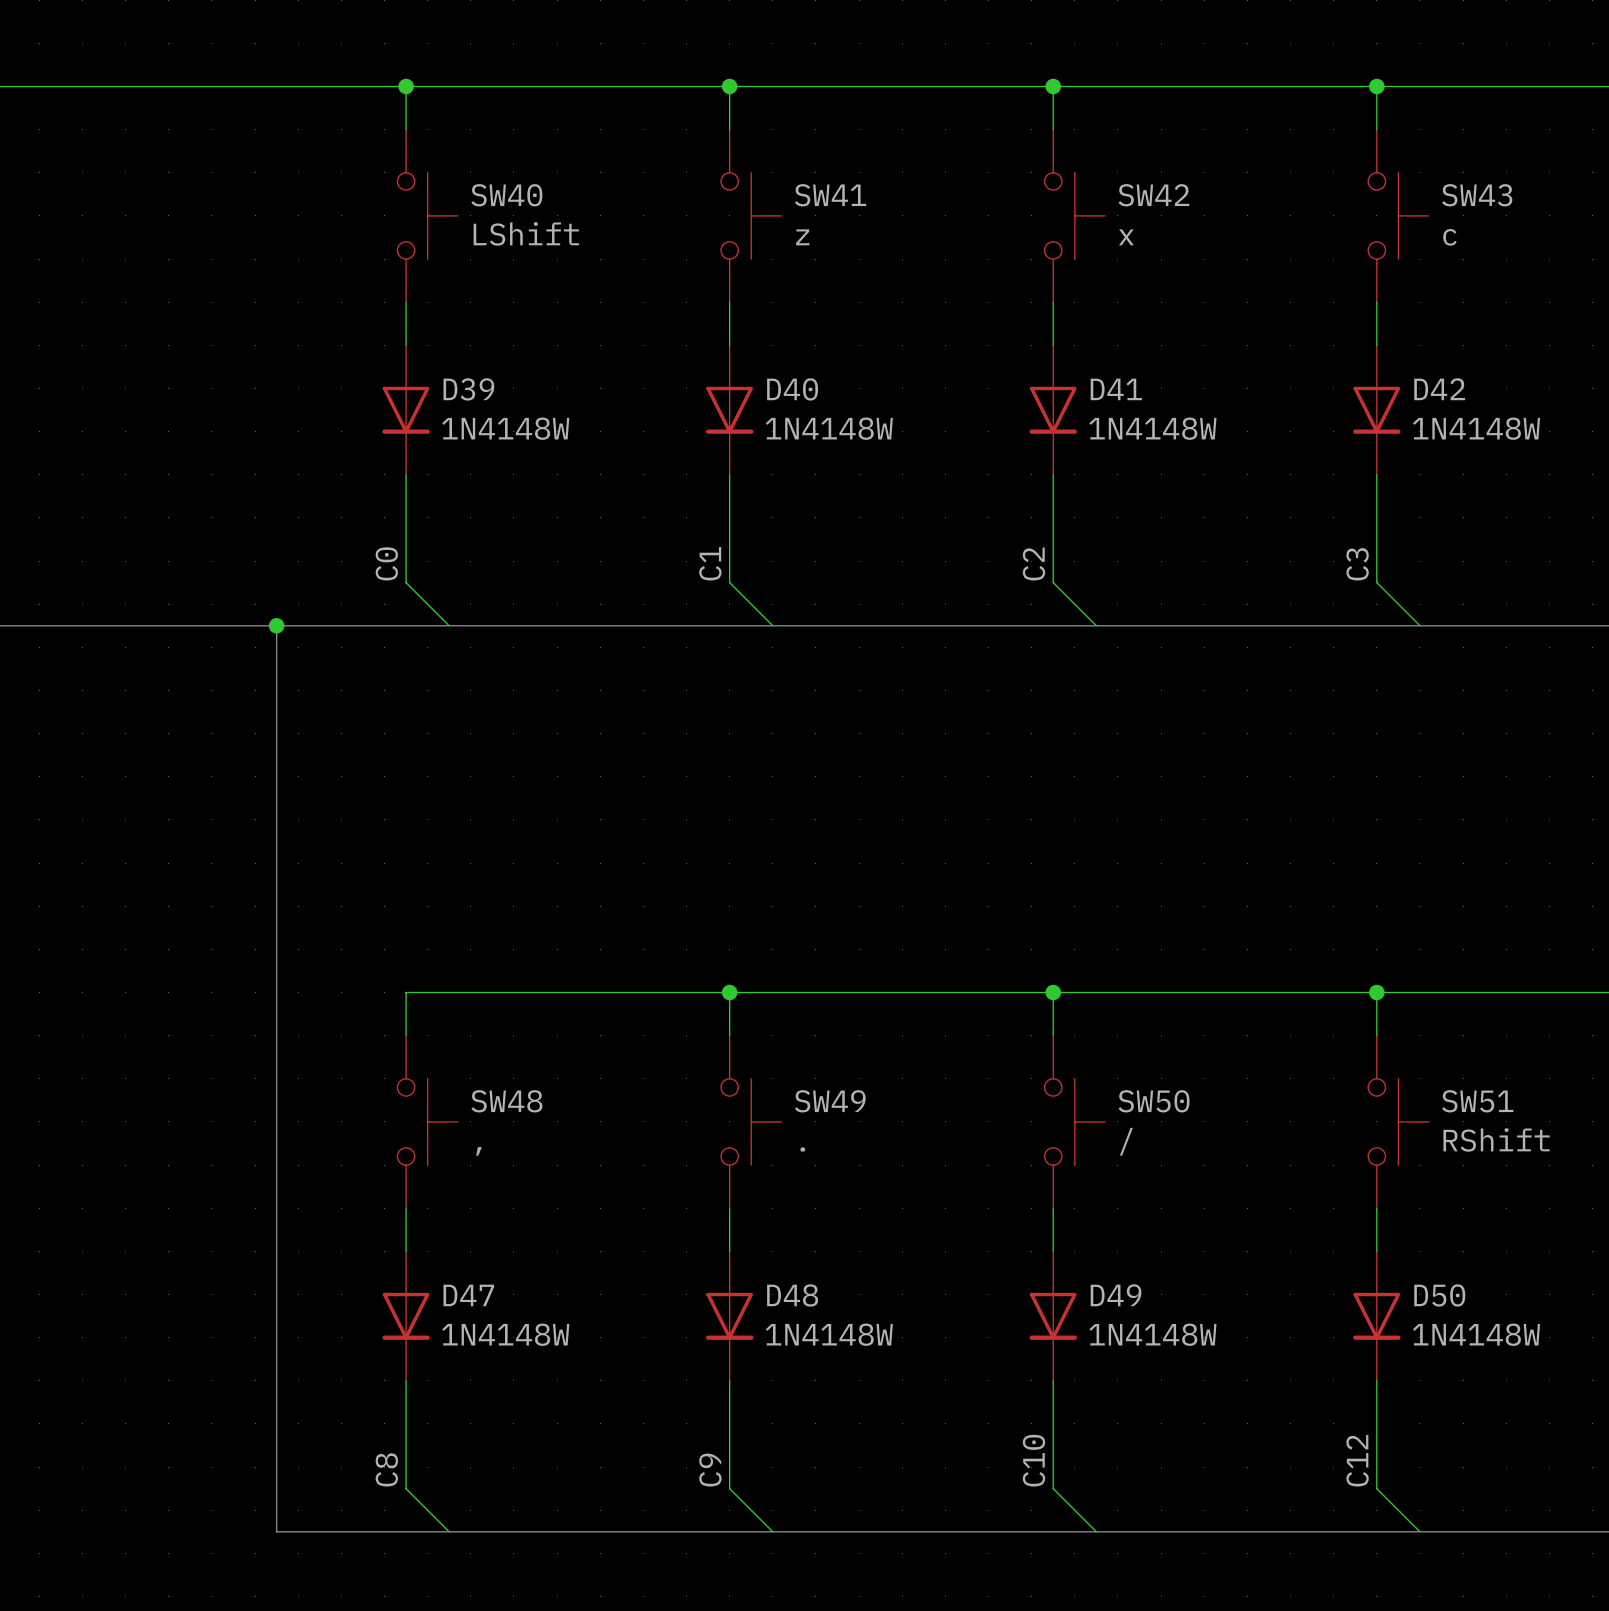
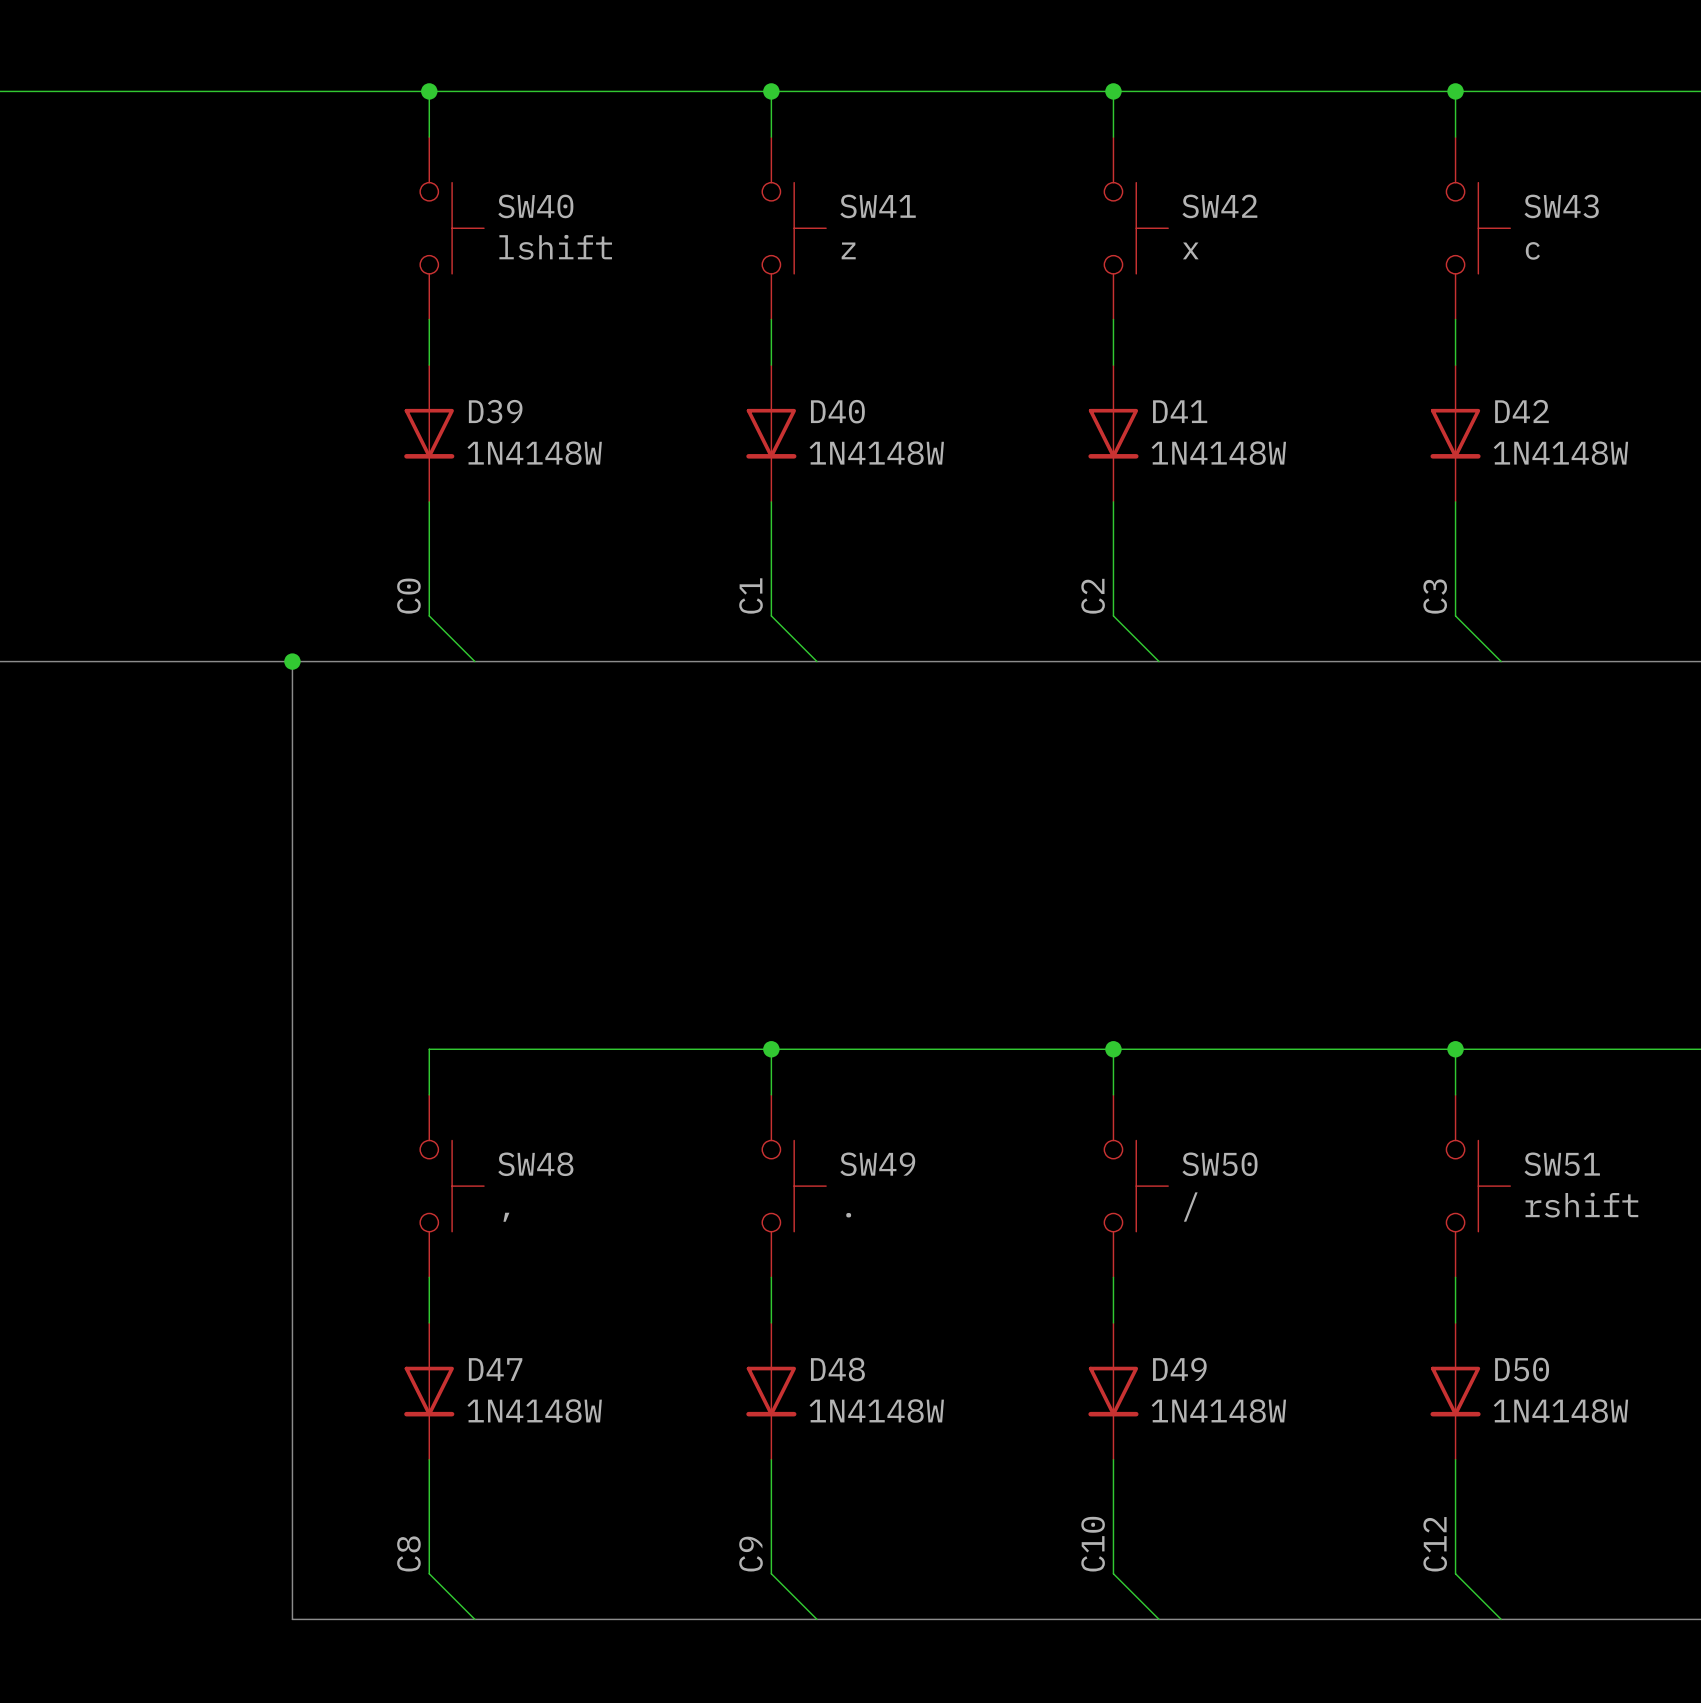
SW40 value: LShift (526, 233) -> lshift (555, 247)
SW51 value: RShift (1496, 1139) -> rshift (1581, 1205)

